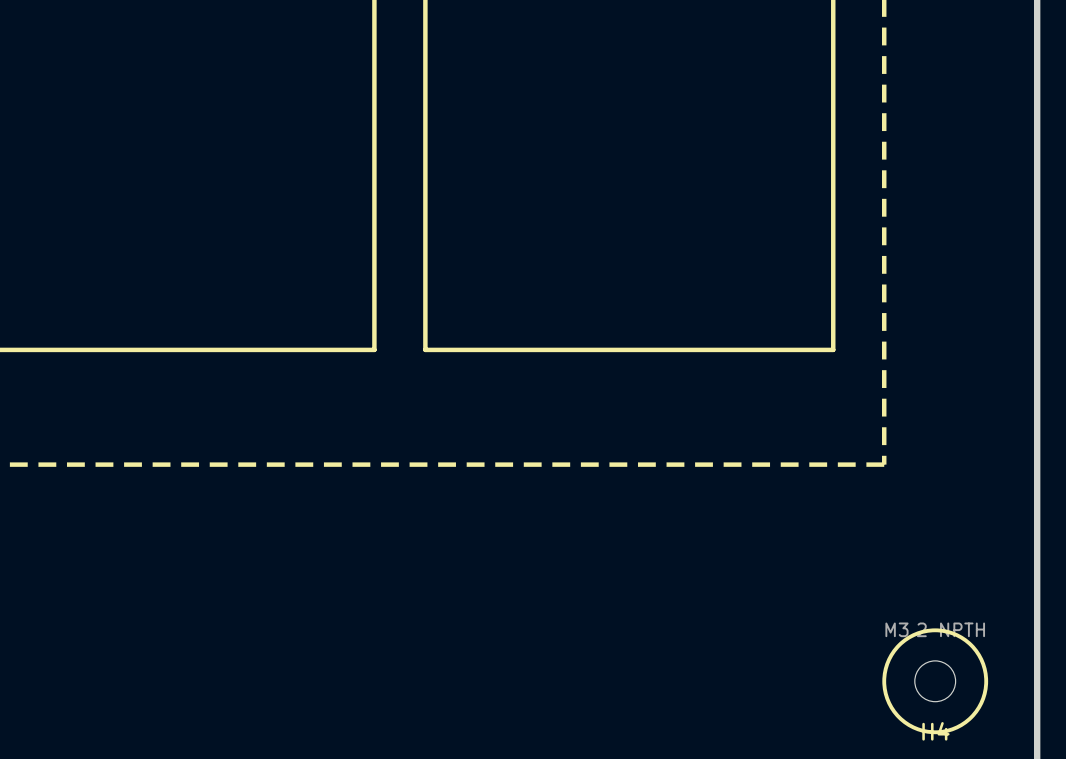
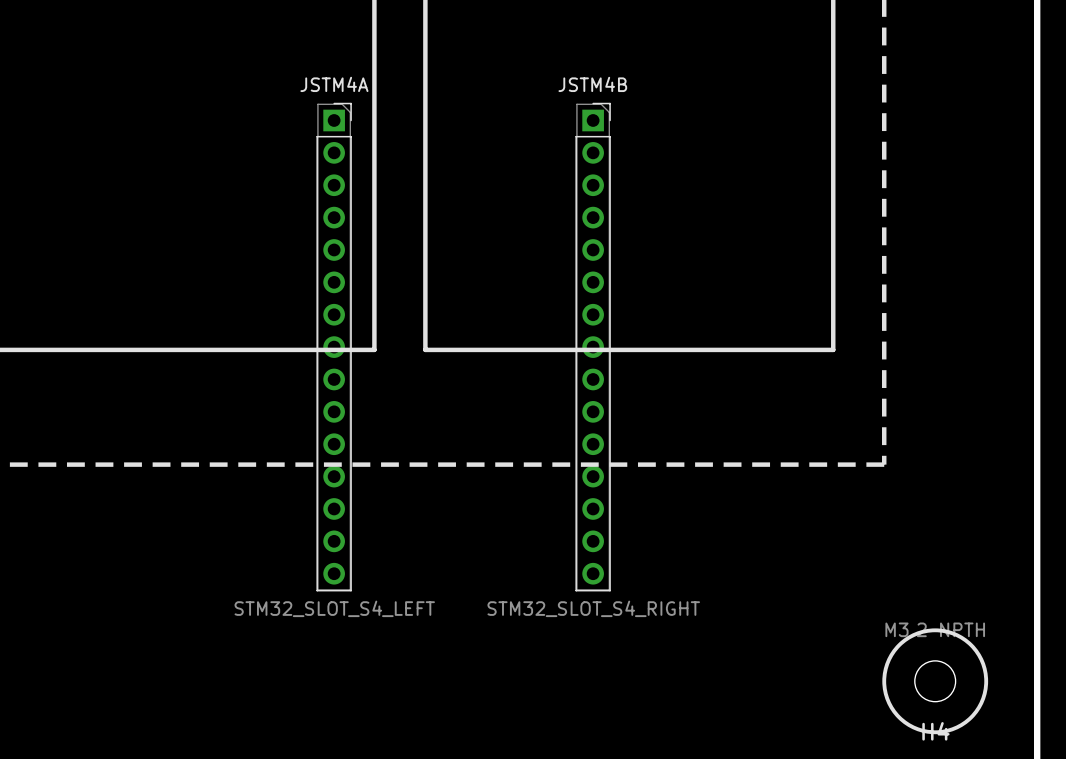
JSTM4A: none -> STM32_SLOT_S4_LEFT (334, 347)
JSTM4B: none -> STM32_SLOT_S4_RIGHT (593, 347)

